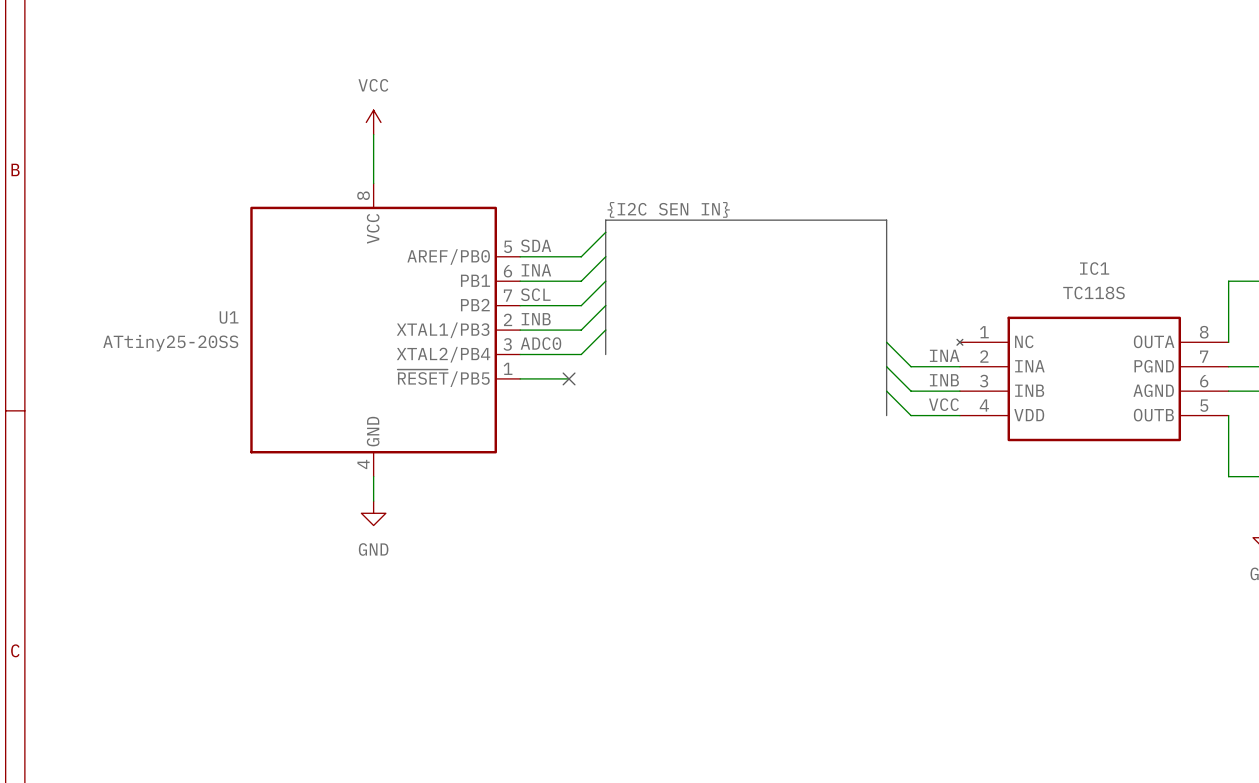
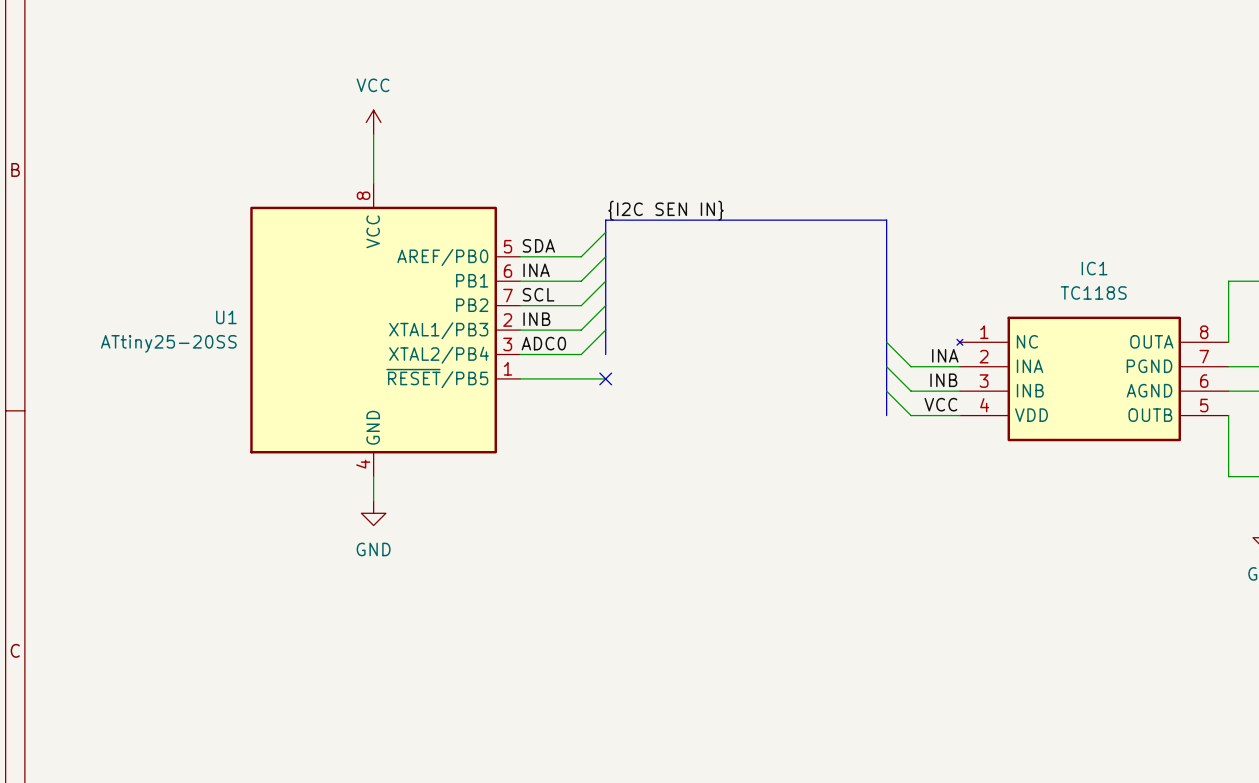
wire: none -> (569, 378) (605, 378)
no-connect mark position: (569, 378) -> (605, 378)

